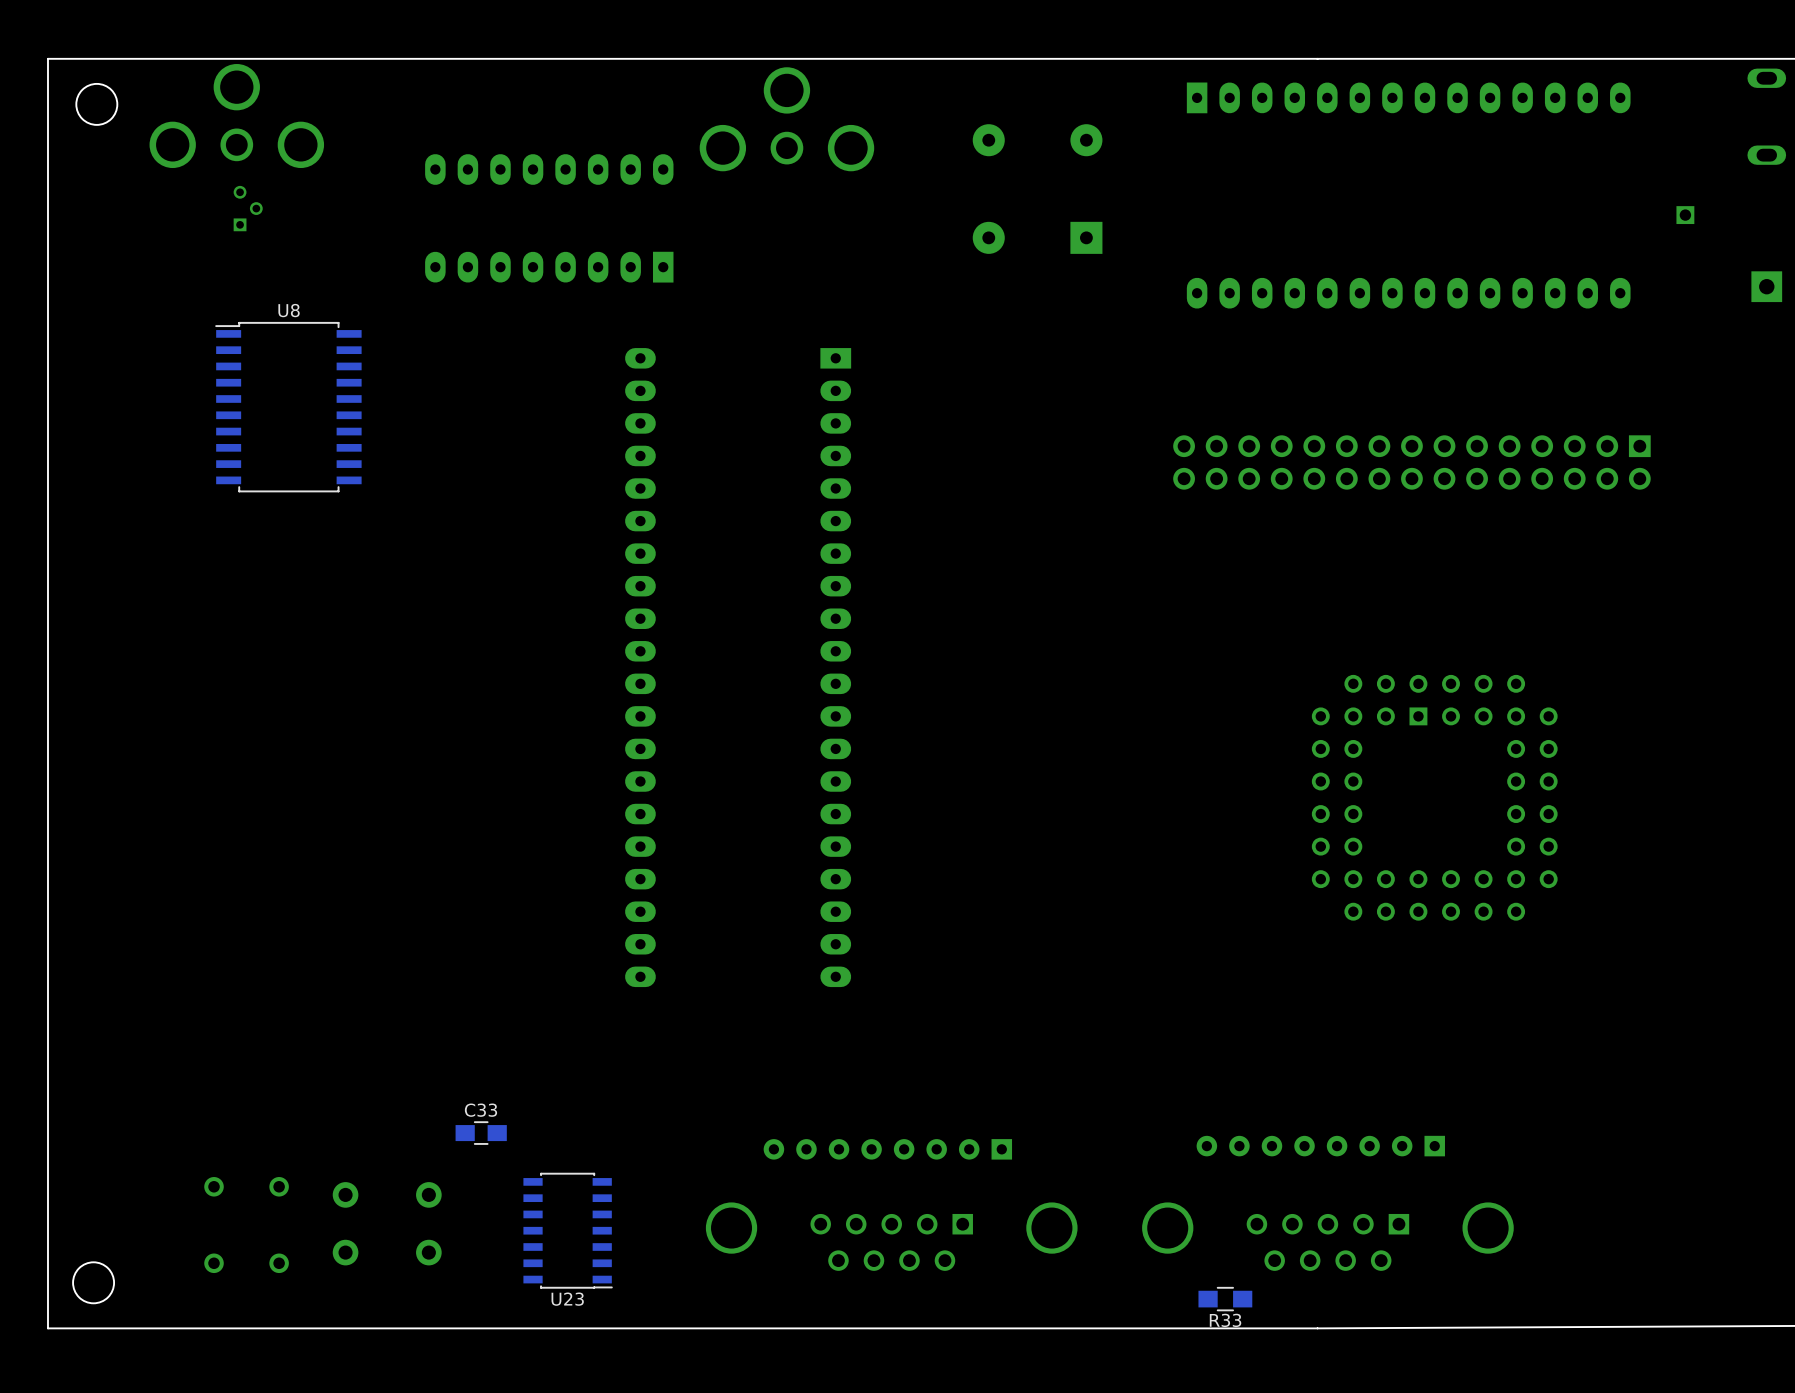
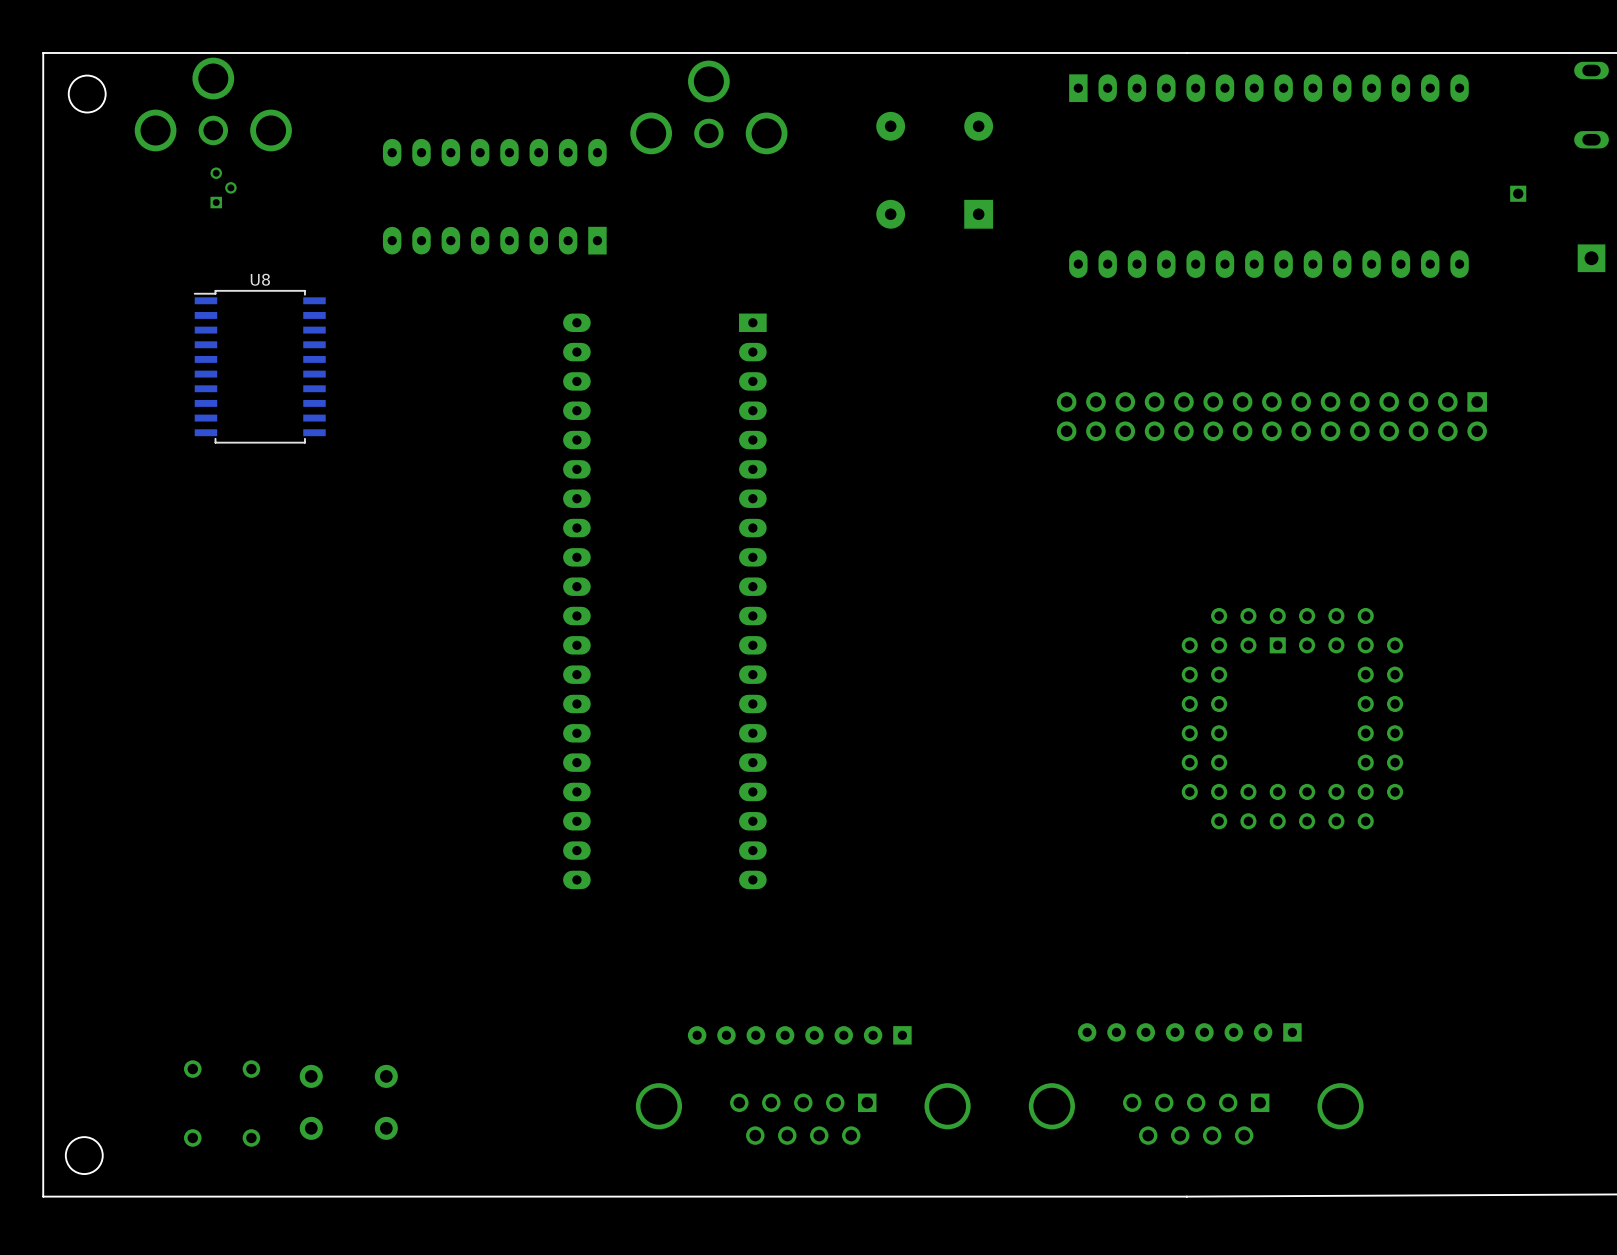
C33: (481, 1133) -> none
U23: (568, 1230) -> none
R33: (1225, 1299) -> none

